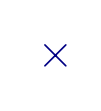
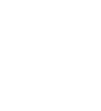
no-connect mark: (55, 55) -> none

